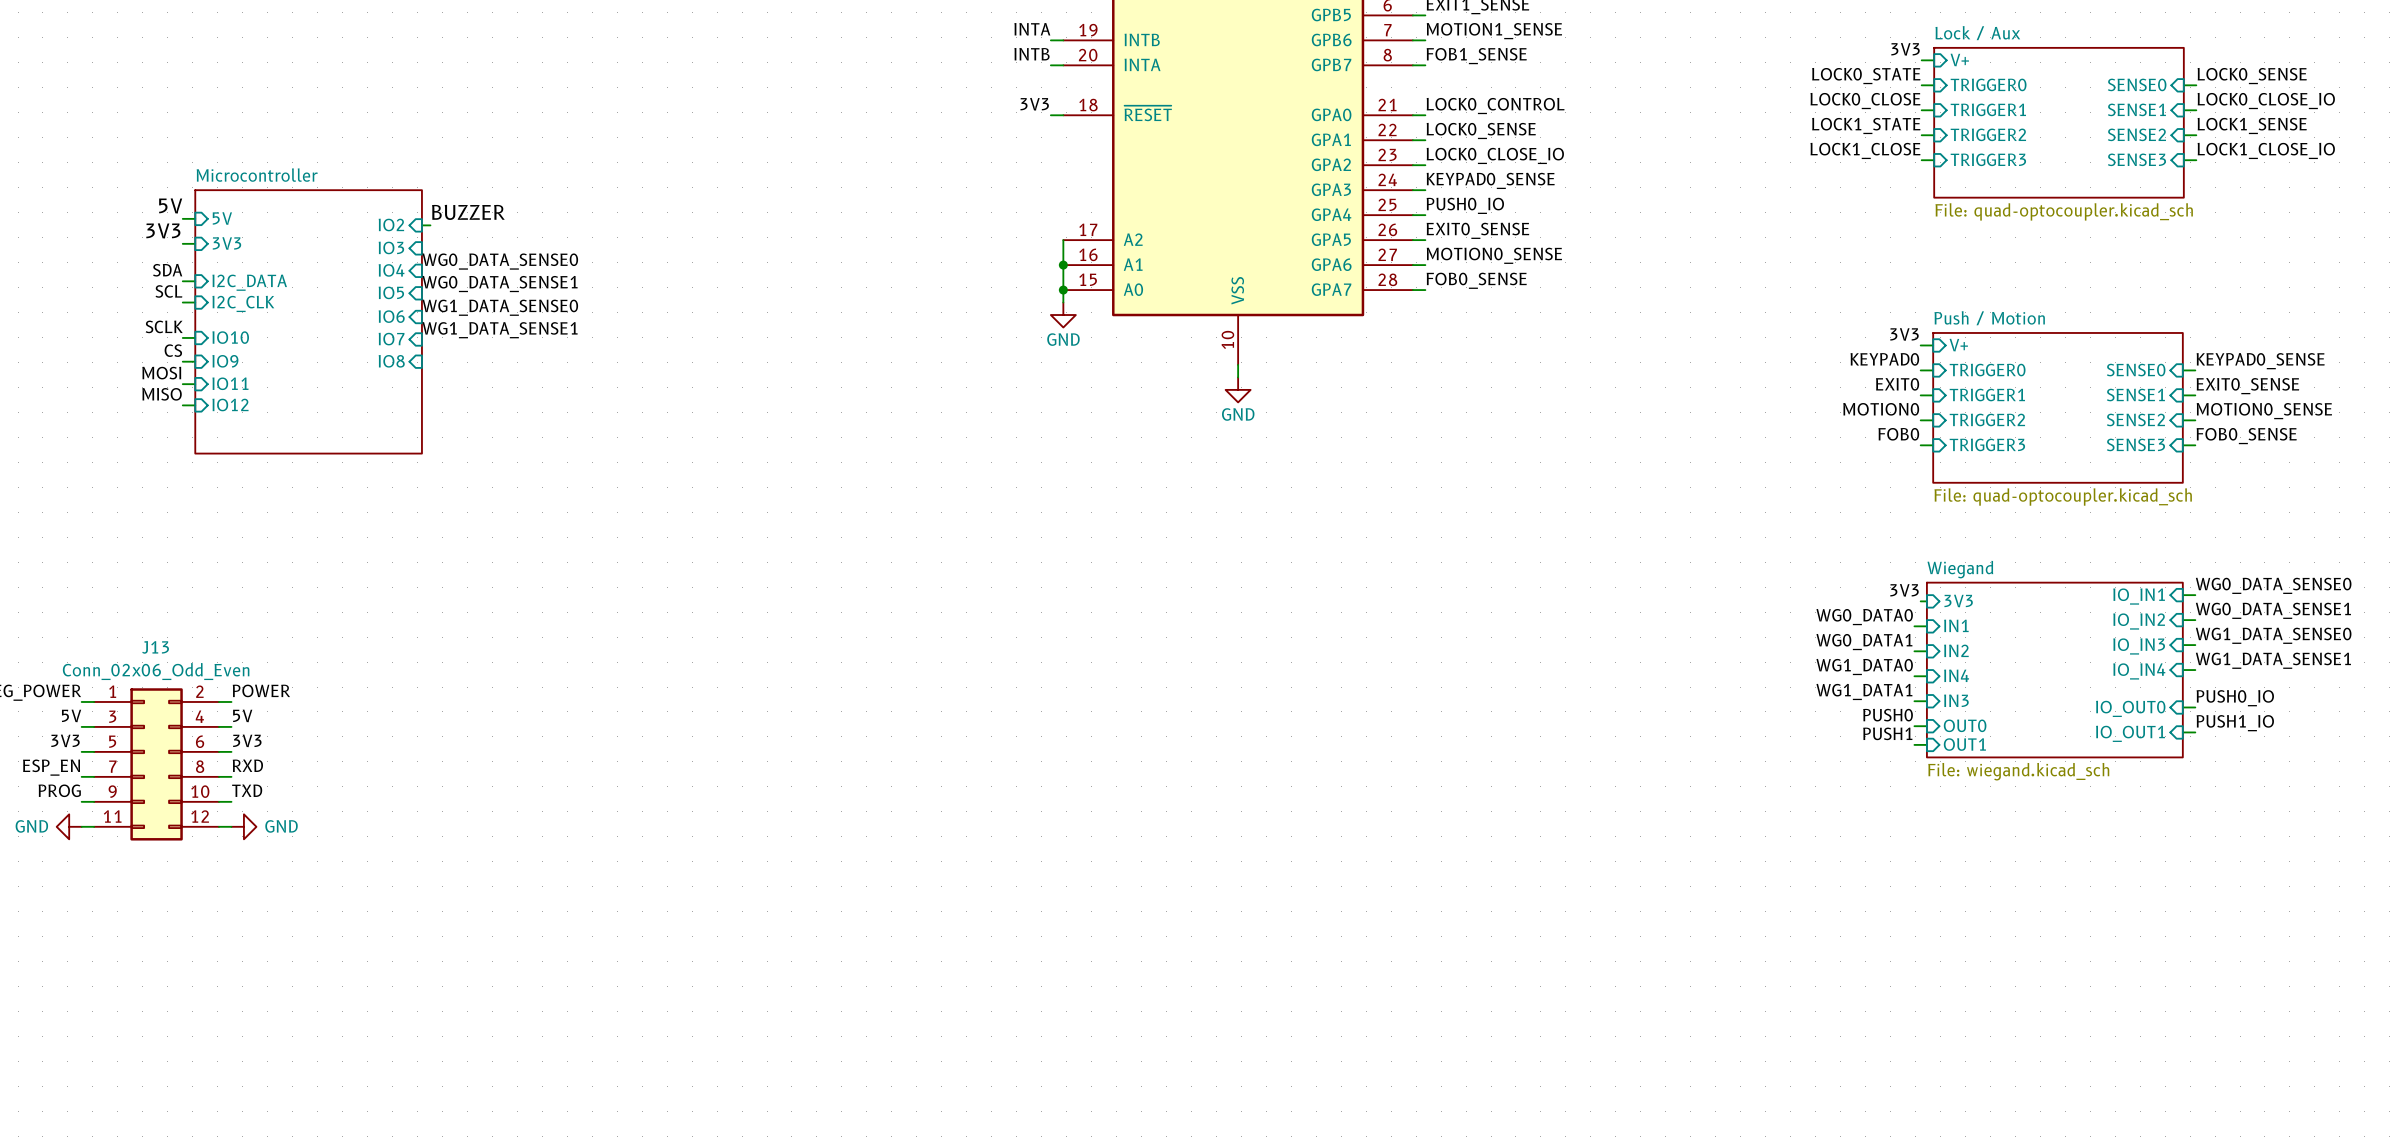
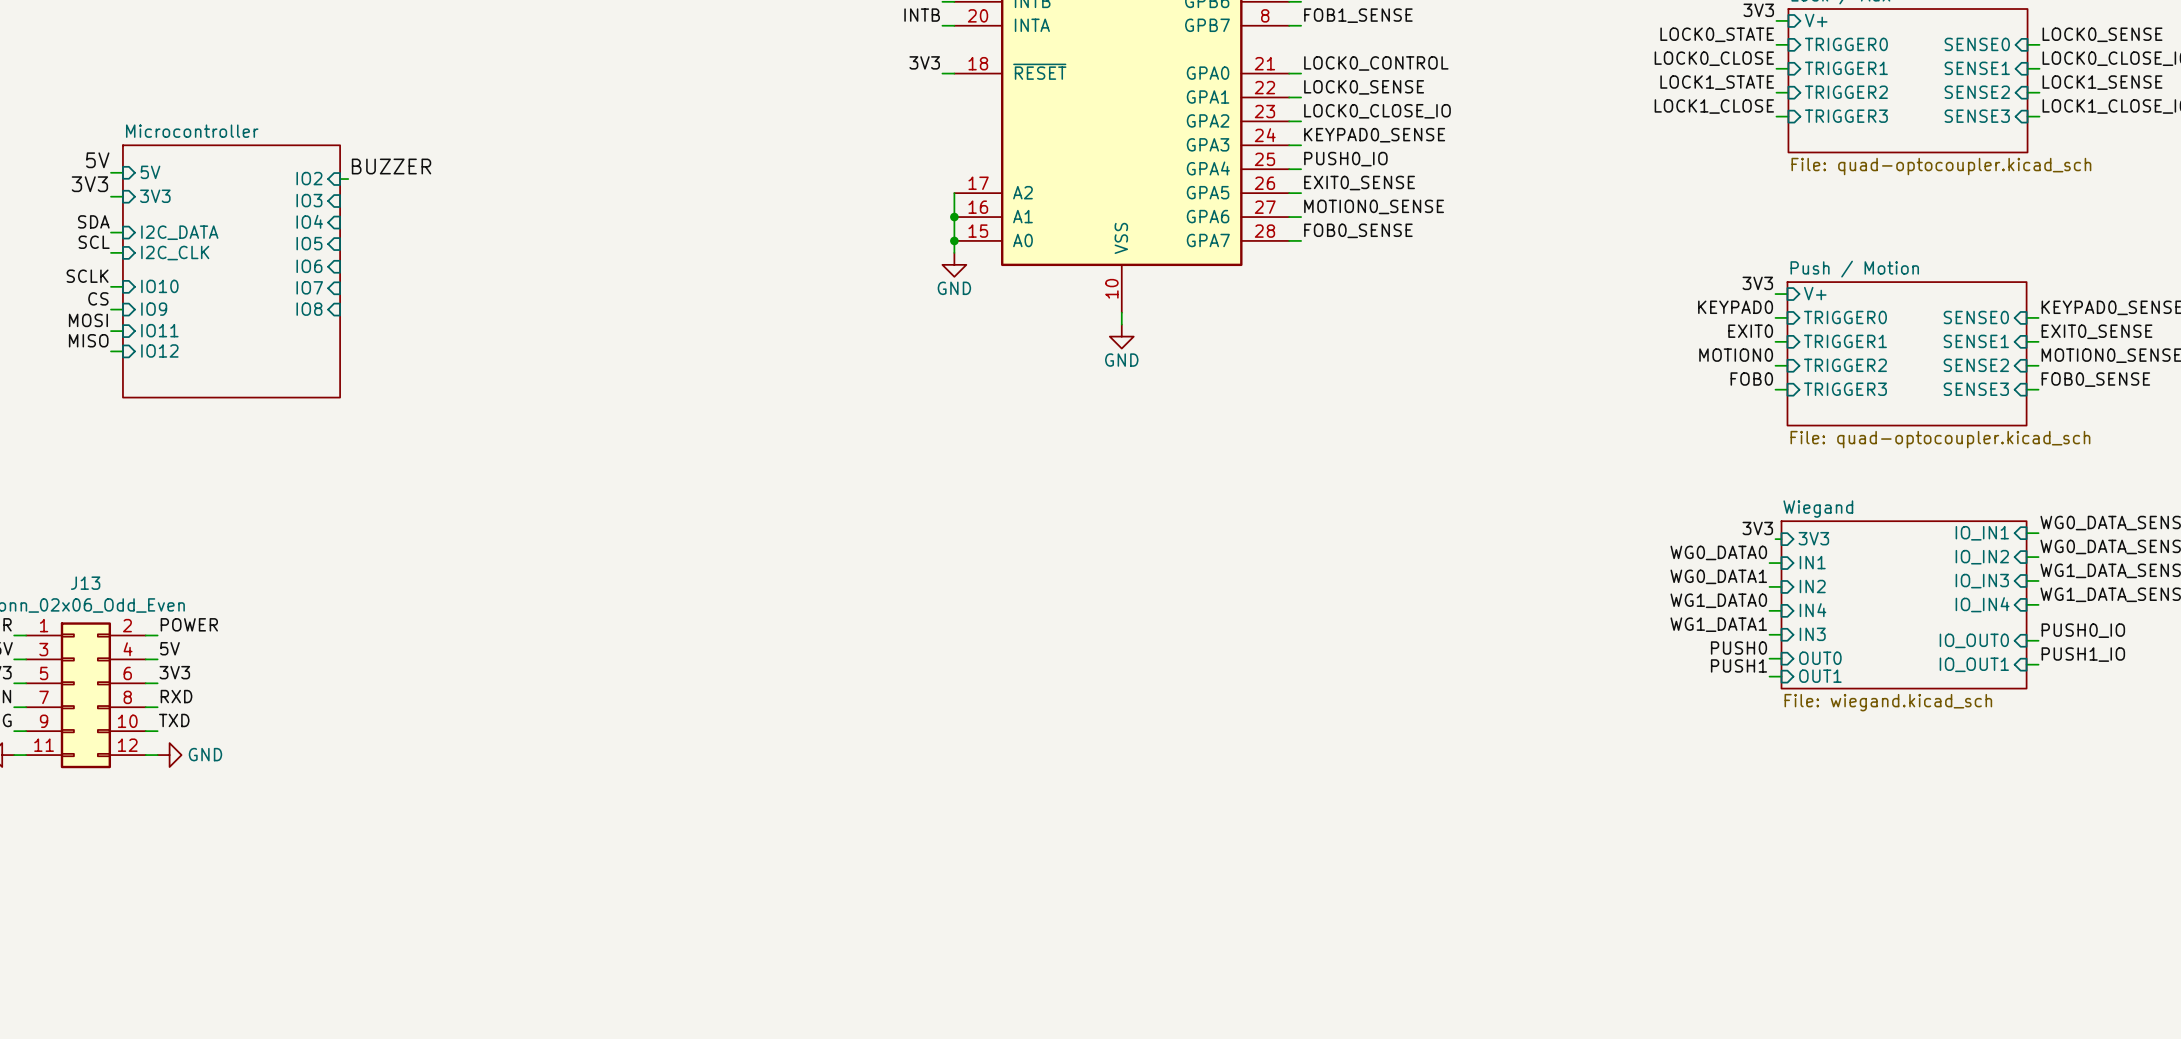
label: WG0_DATA_SENSE0 (500, 261) -> none
label: WG0_DATA_SENSE1 (500, 284) -> none
label: WG1_DATA_SENSE0 (500, 307) -> none
label: WG1_DATA_SENSE1 (500, 330) -> none

